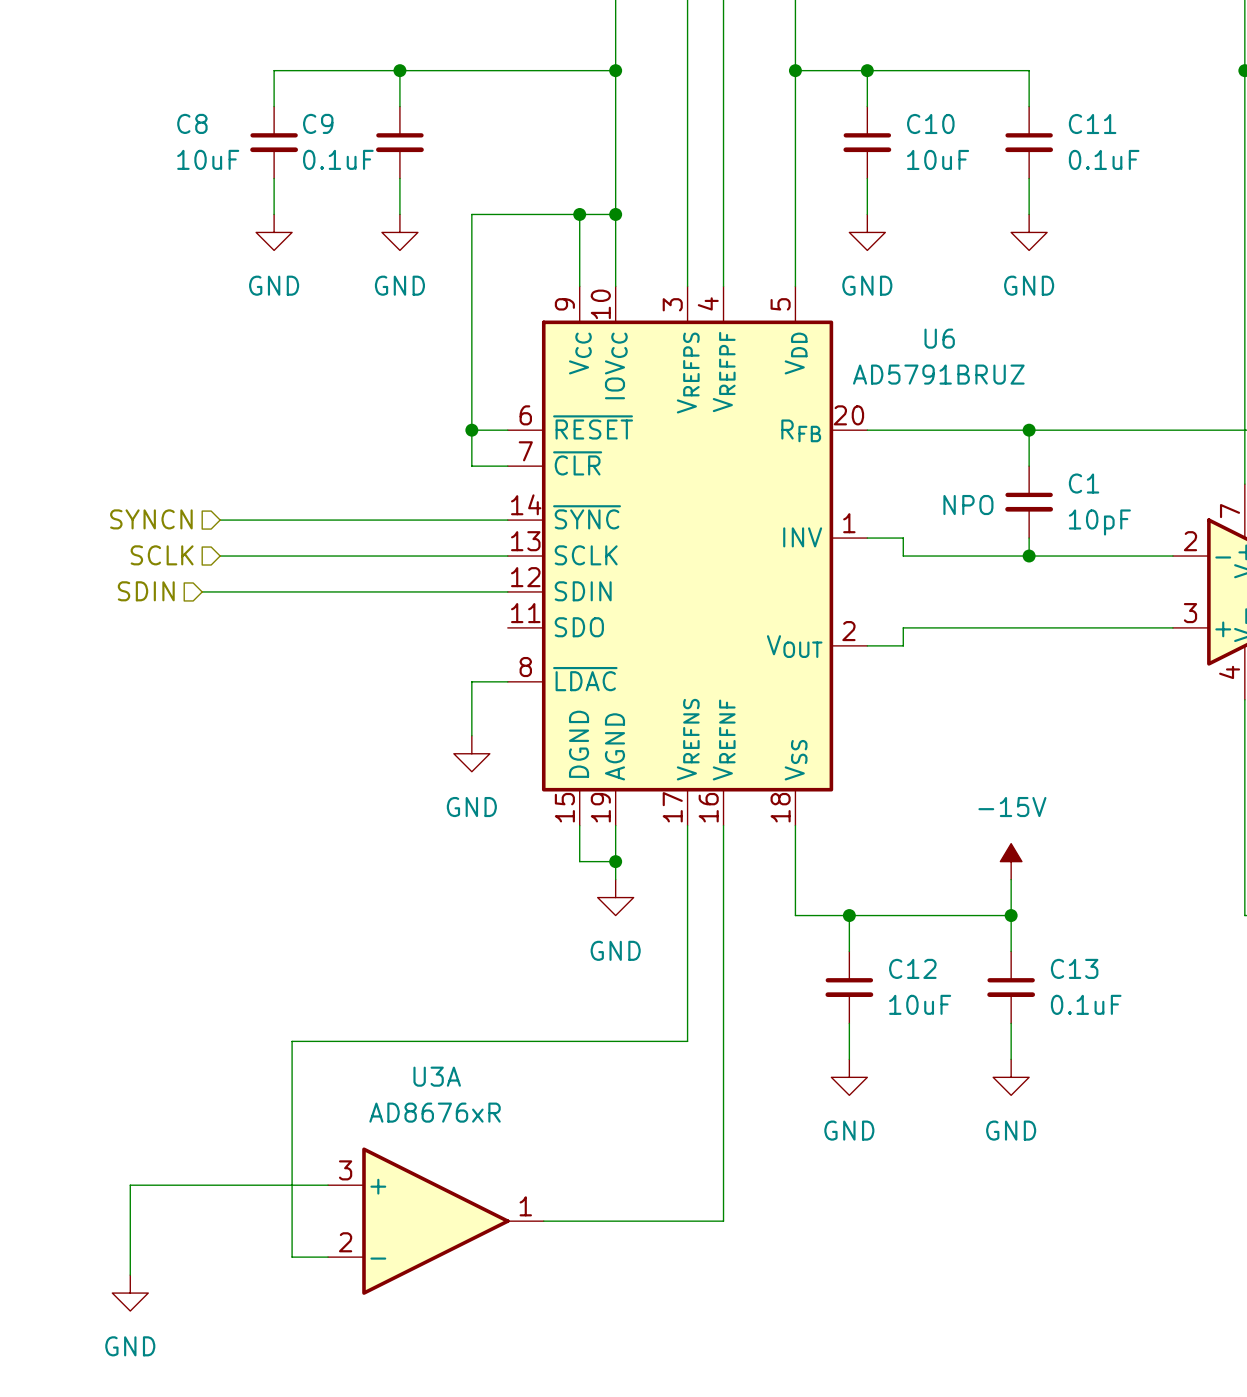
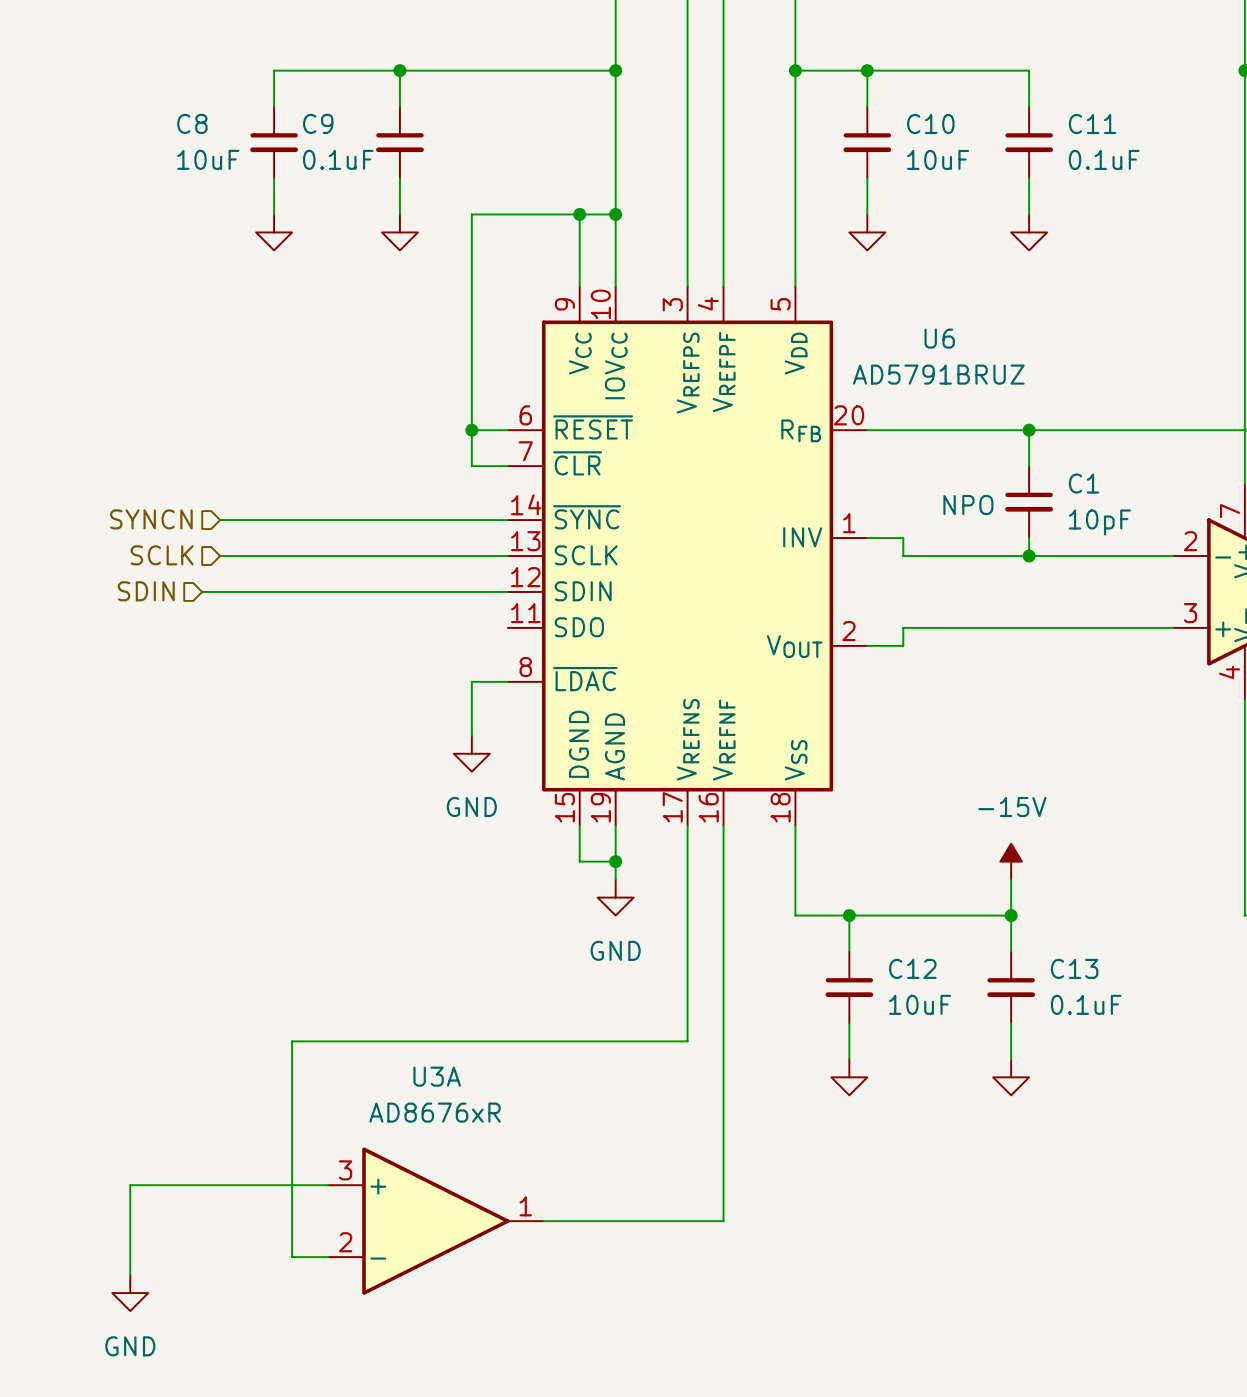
power symbol text: GND (274, 285) -> none
power symbol text: GND (399, 285) -> none
power symbol text: GND (867, 285) -> none
power symbol text: GND (1029, 285) -> none
power symbol text: GND (849, 1130) -> none
power symbol text: GND (1011, 1130) -> none

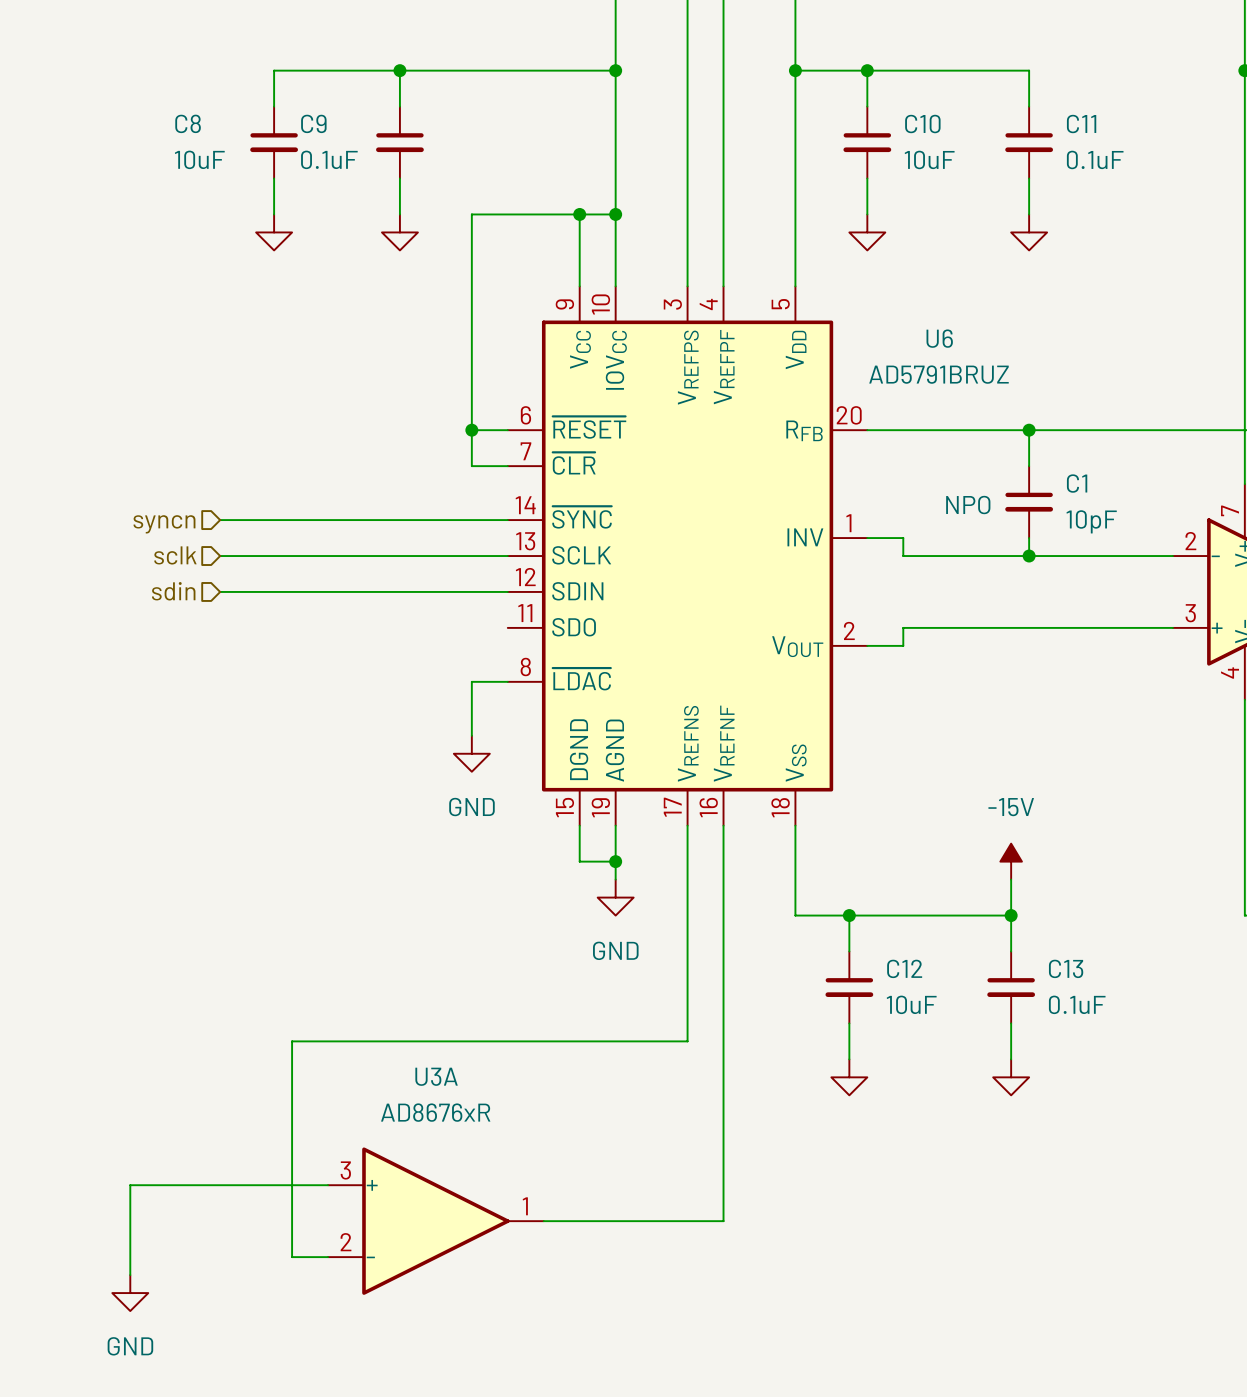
hierarchical label: SYNCN (151, 519) -> syncn (164, 524)
hierarchical label: SCLK (162, 555) -> sclk (175, 555)
hierarchical label: SDIN (146, 591) -> none
hierarchical label: none -> sdin (173, 591)
wire: (202, 591) (220, 591) -> none

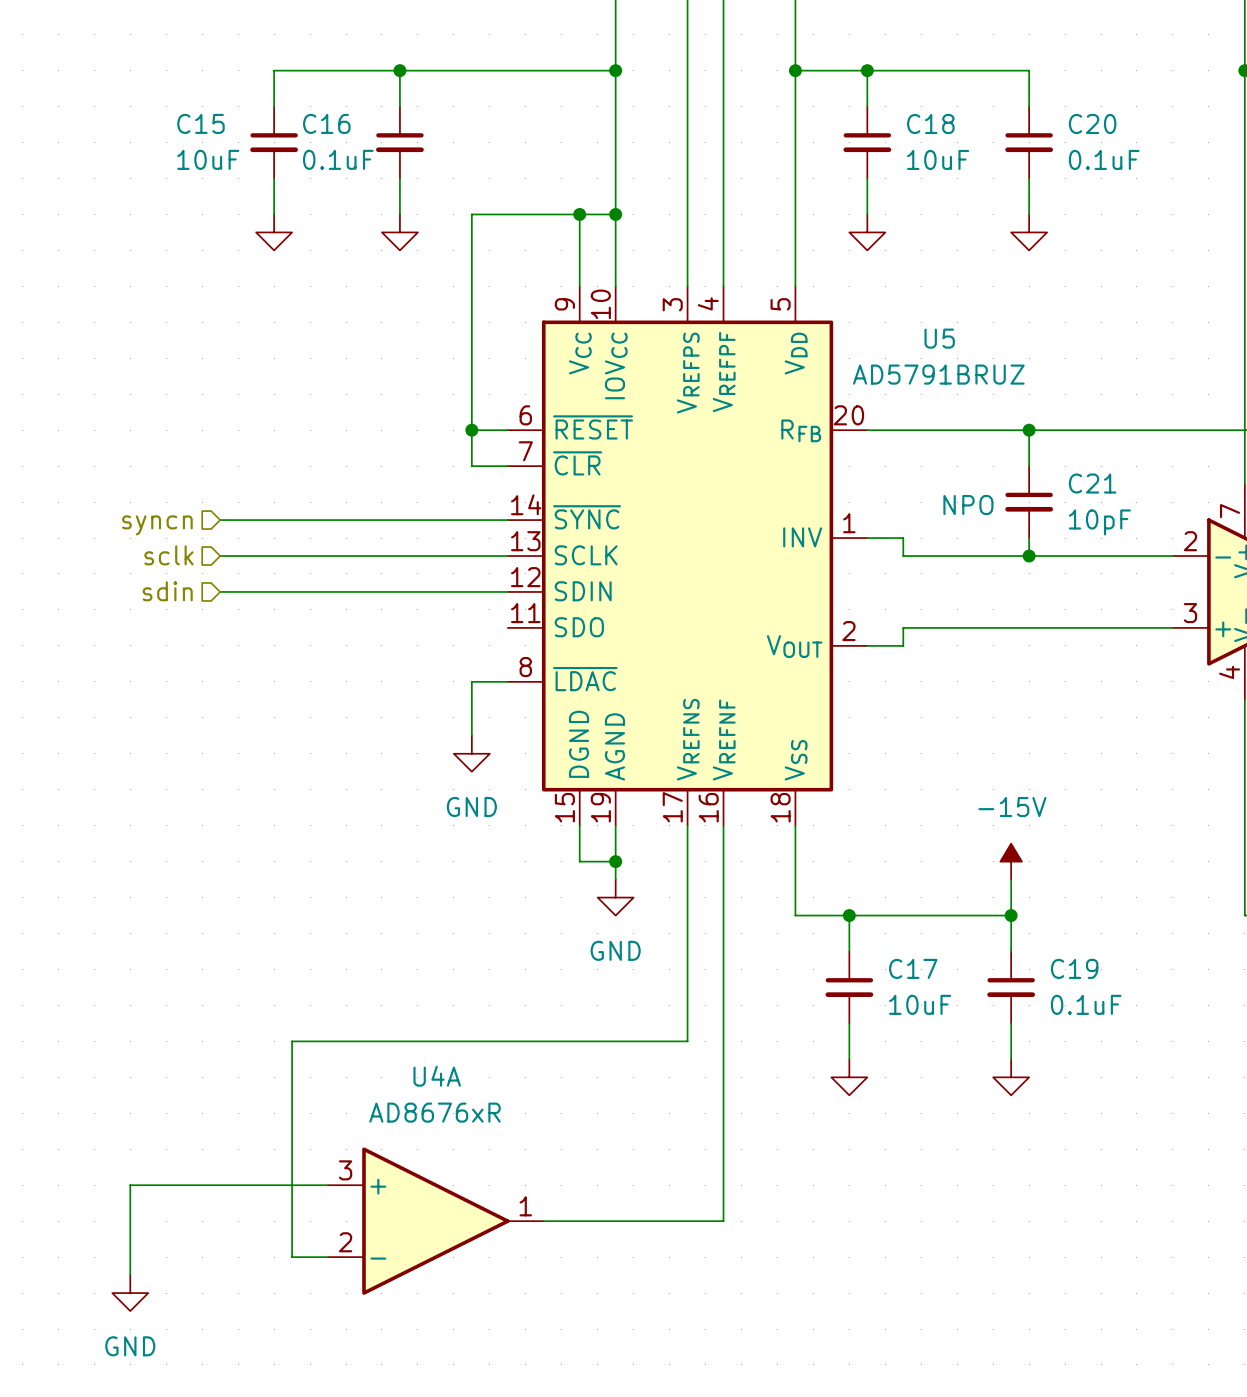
C8 name: C8 (188, 123) -> C15 (200, 123)
C9 name: C9 (313, 123) -> C16 (326, 123)
C10 name: C10 (922, 124) -> C18 (930, 123)
C11 name: C11 (1081, 124) -> C20 (1092, 123)
U6 name: U6 (939, 338) -> U5 (939, 338)
C1 name: C1 (1077, 483) -> C21 (1092, 483)
C12 name: C12 (904, 968) -> C17 (913, 968)
C13 name: C13 (1066, 968) -> C19 (1074, 968)
U3A name: U3A (436, 1076) -> U4A (437, 1076)

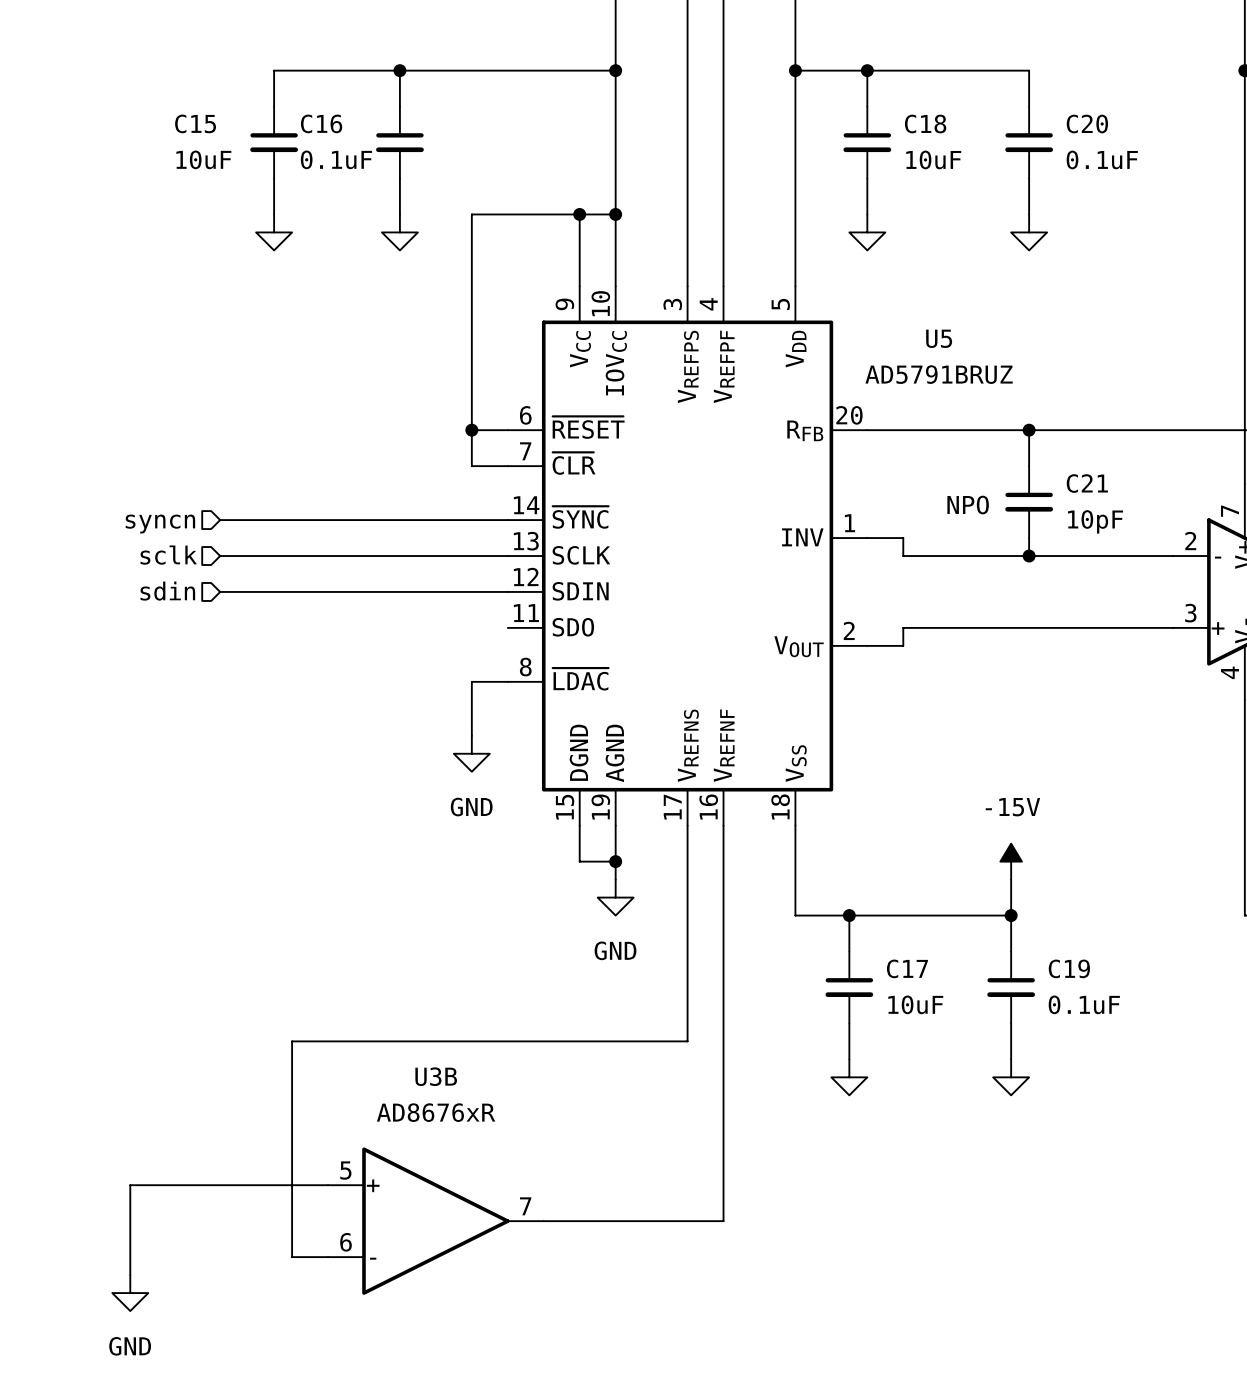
U4A name: U4A (437, 1076) -> U3B (436, 1076)
U4A pin number: 3 (345, 1170) -> 5 (345, 1170)
U4A pin number: 1 (525, 1206) -> 7 (525, 1206)
U4A pin number: 2 (345, 1242) -> 6 (346, 1242)

